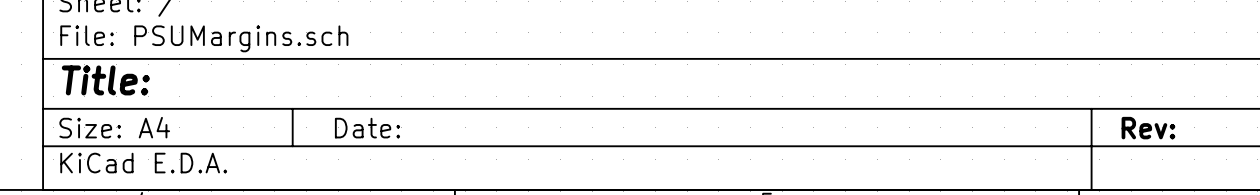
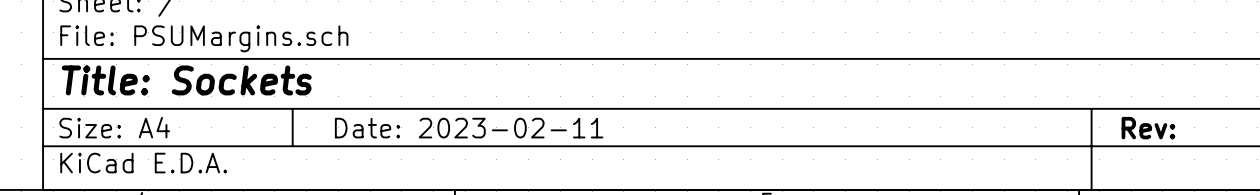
title block: Title: (105, 80) -> Title: Sockets (186, 80)
title block: Date: (367, 128) -> Date: 2023-02-11 (469, 128)

